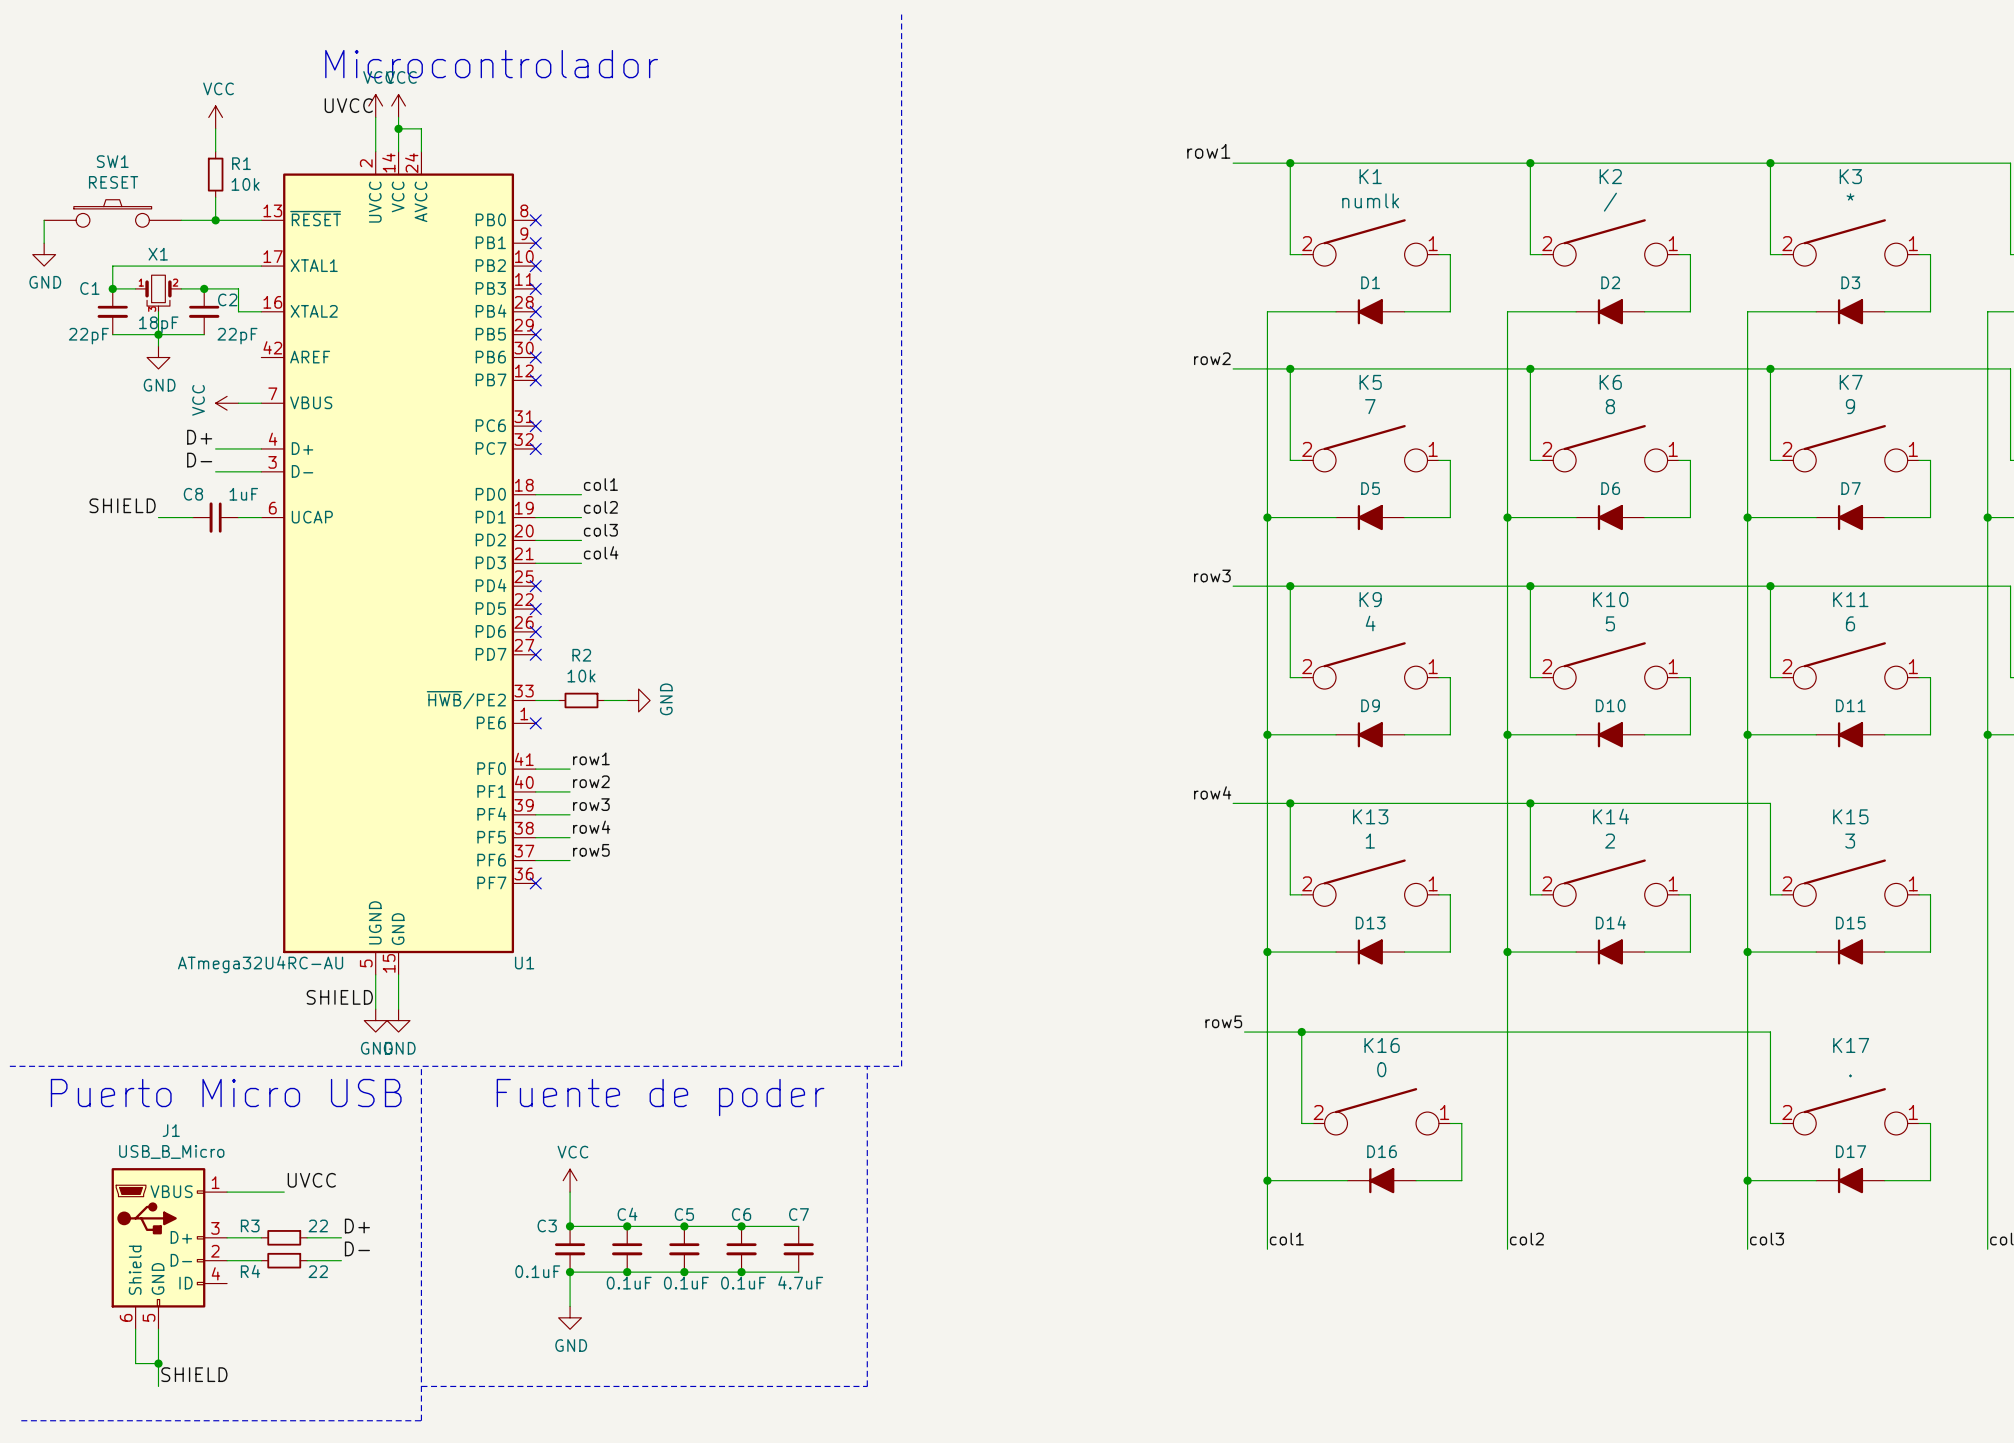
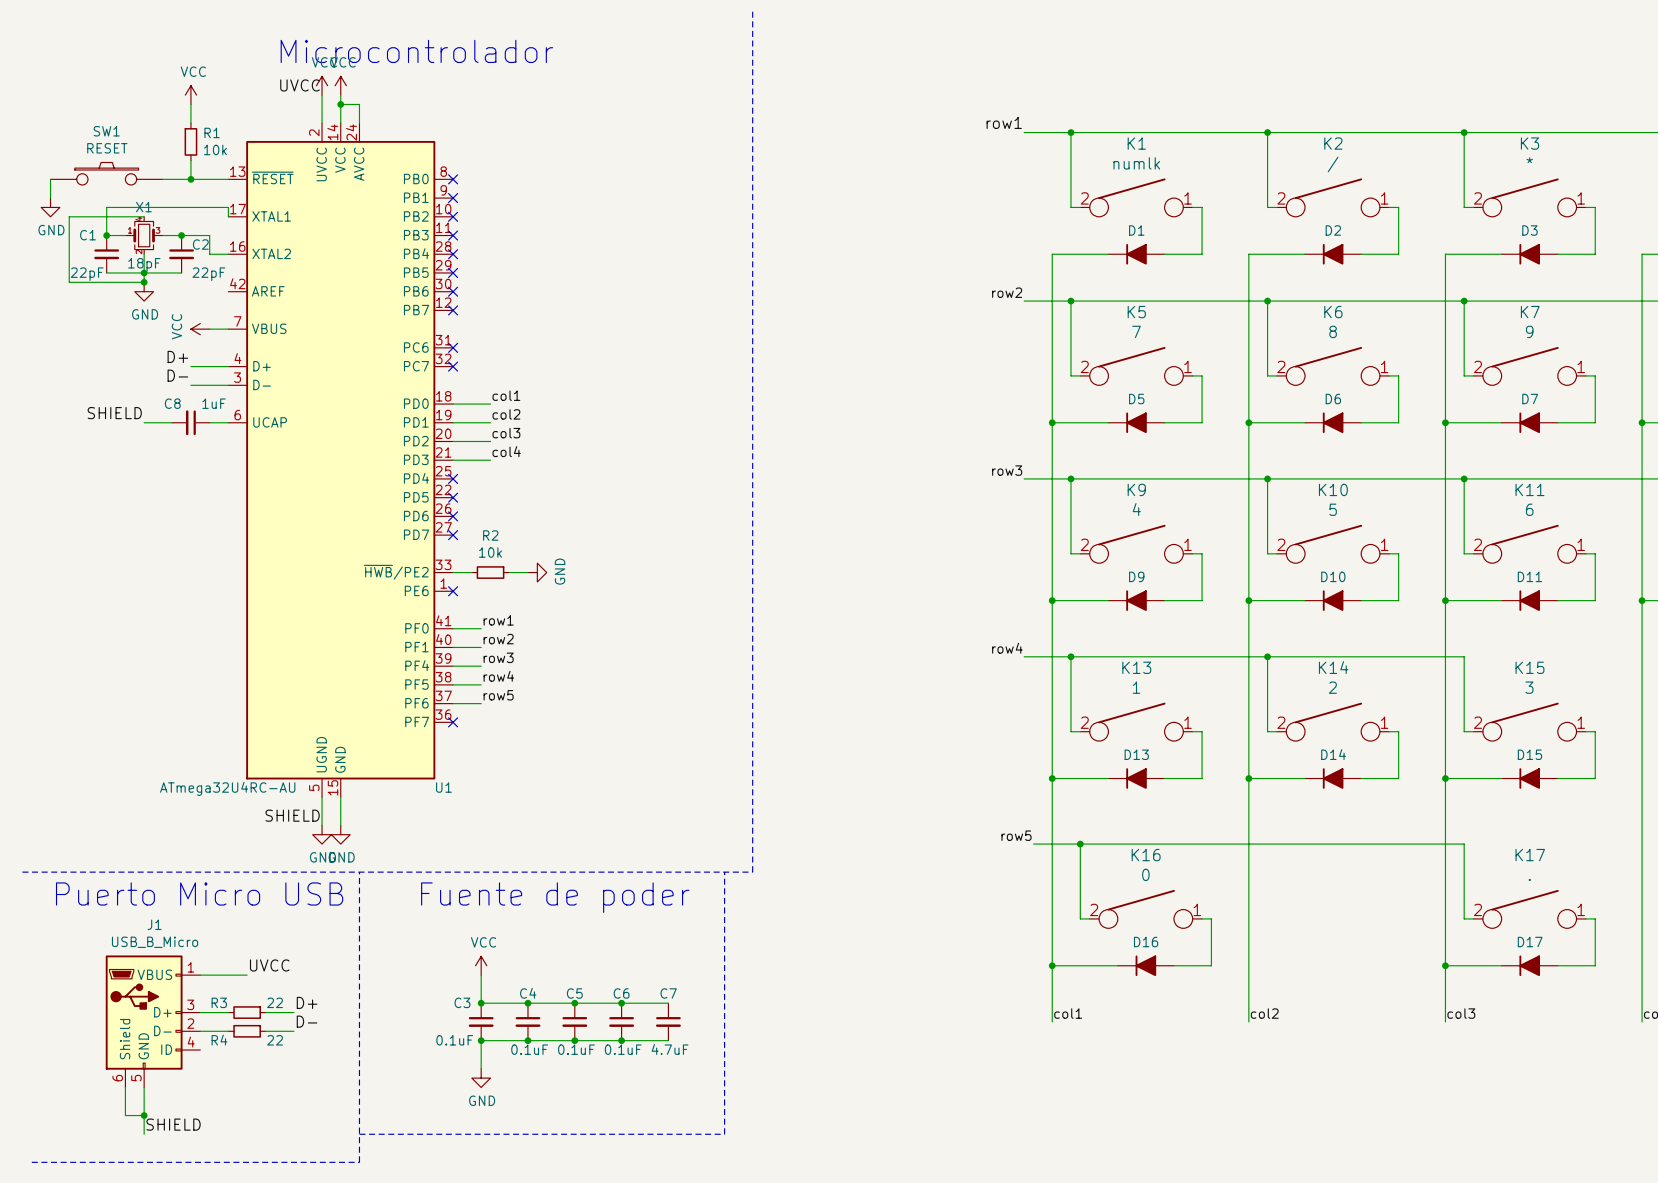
wire: (158, 266) (261, 266) -> (144, 282) (69, 282) (69, 216) (106, 216) (106, 207) (228, 207) (228, 216)
X1 symbol: [135, 275, 182, 312] -> [125, 216, 163, 255]
junction: none -> (144, 282)

